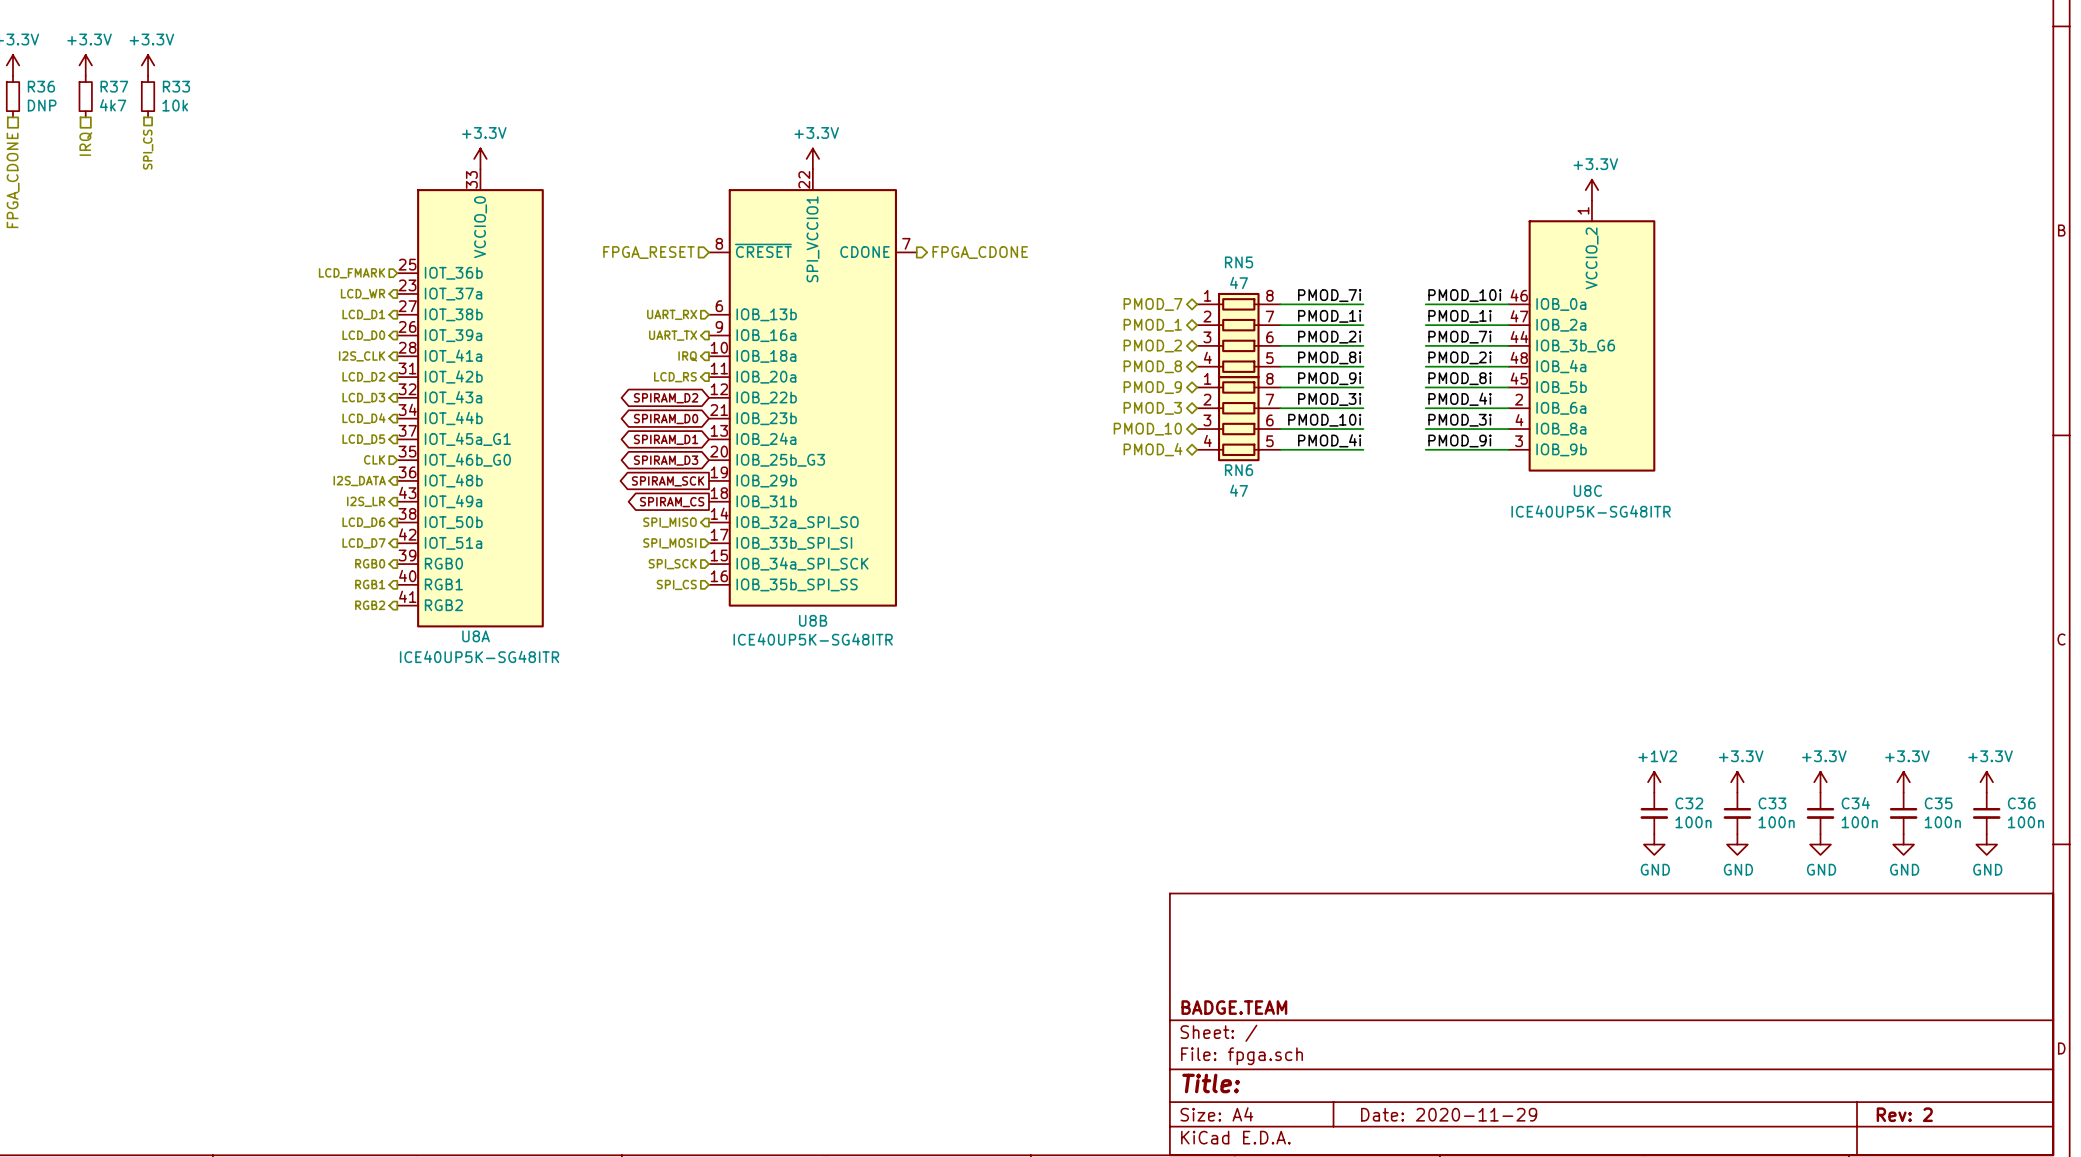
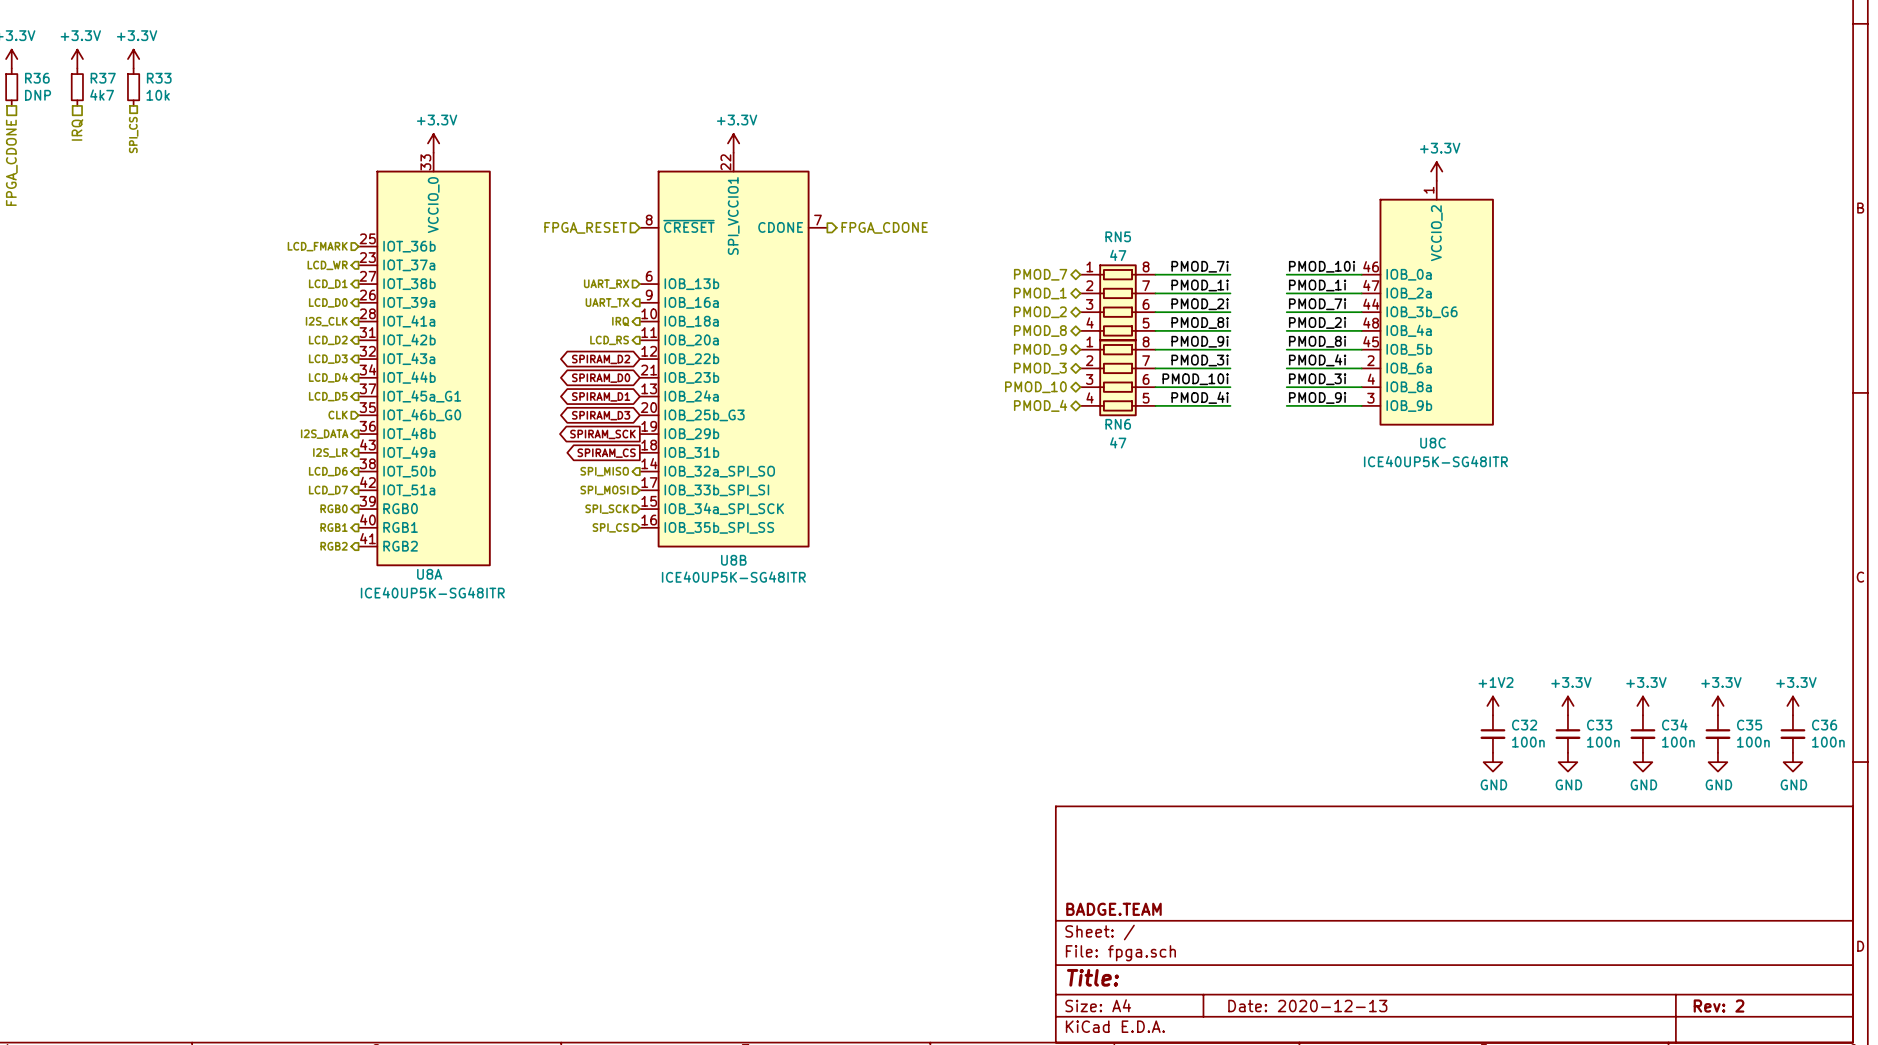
title block: Date: 2020-11-29 (1449, 1114) -> Date: 2020-12-13 (1307, 1006)

